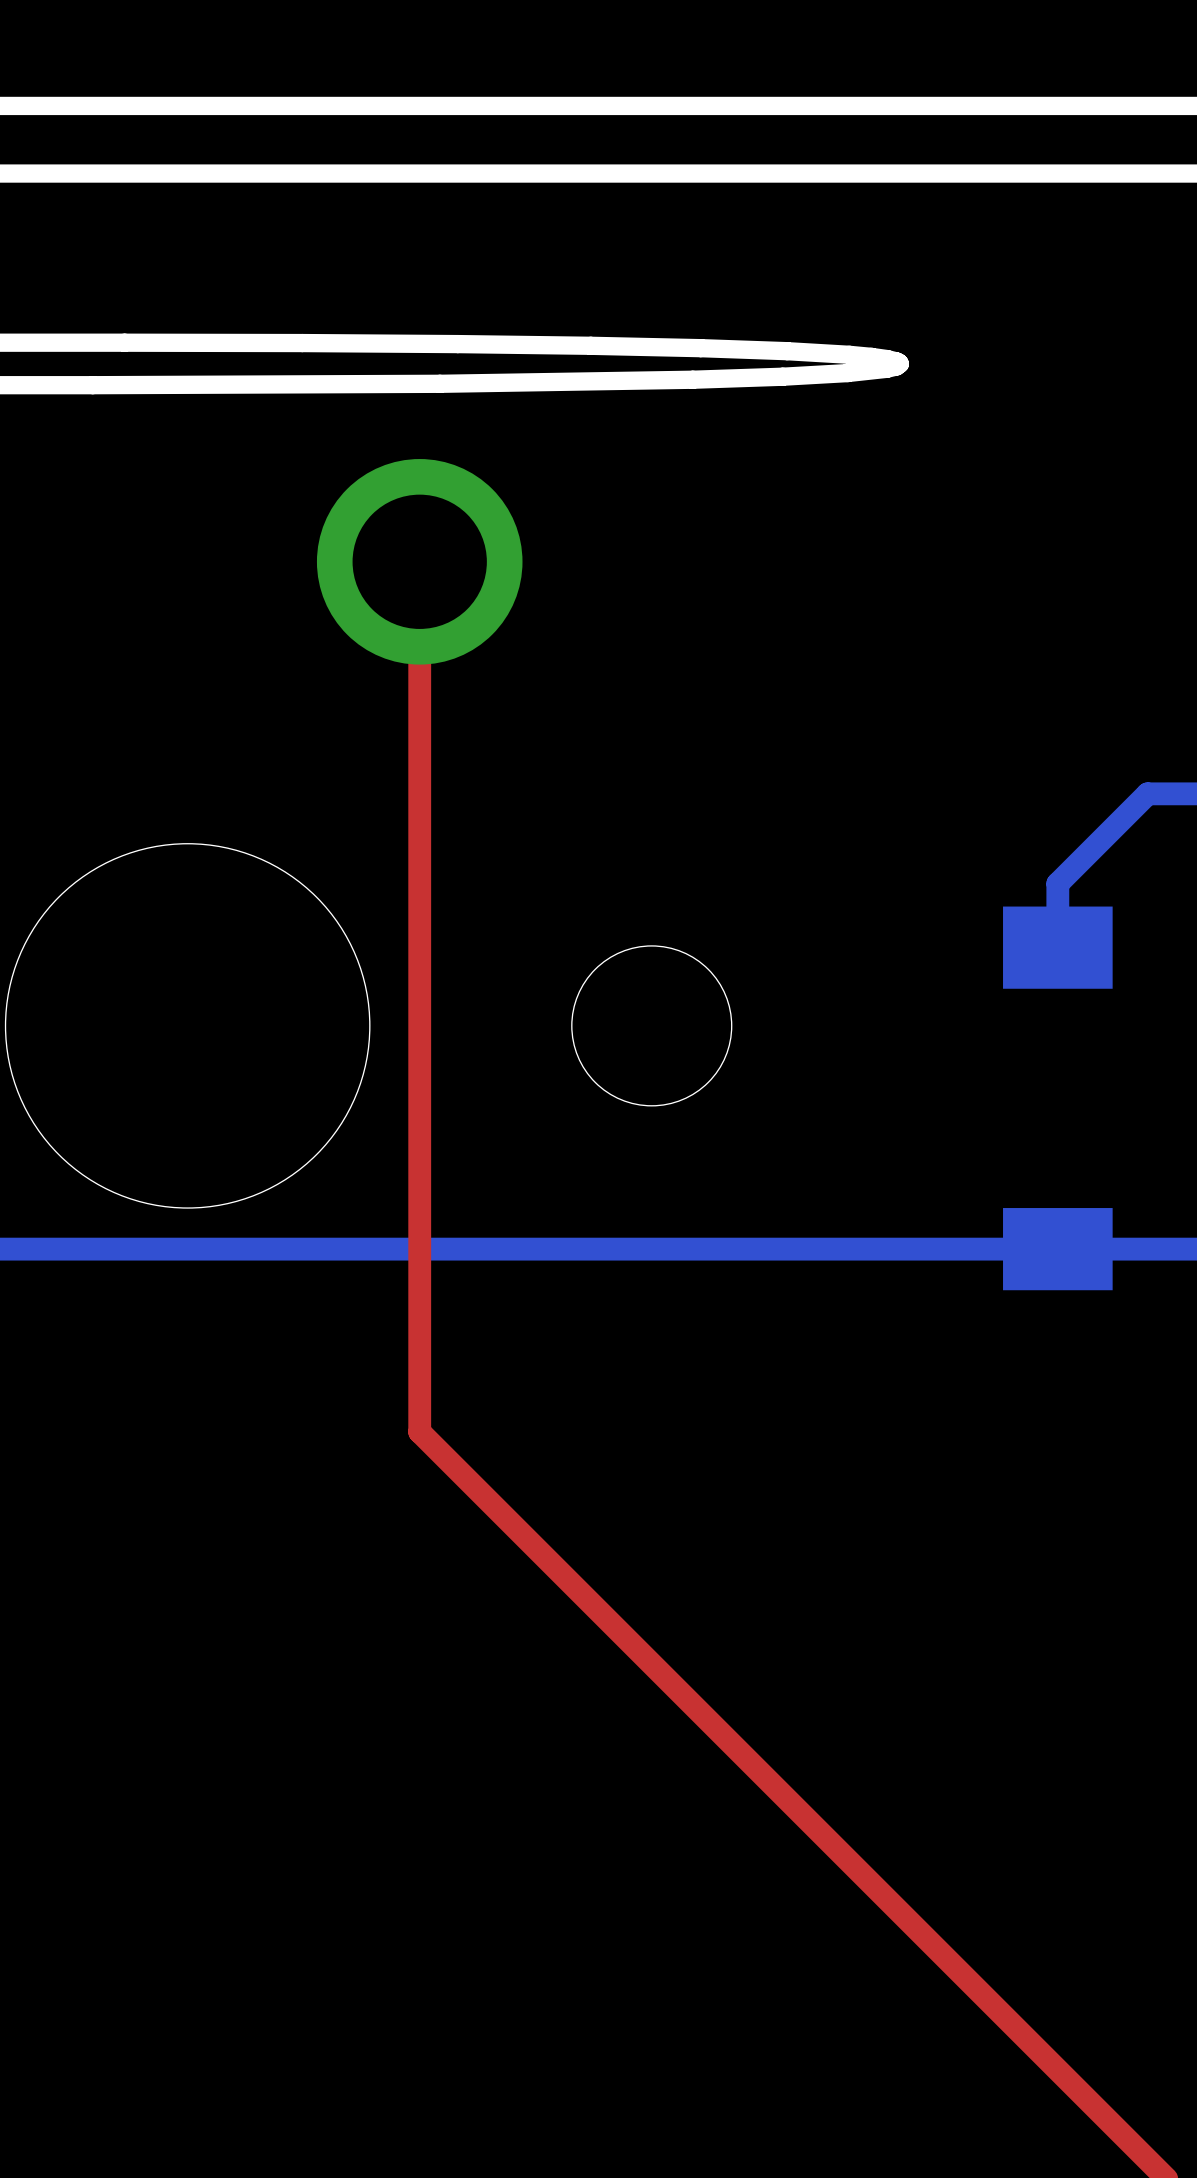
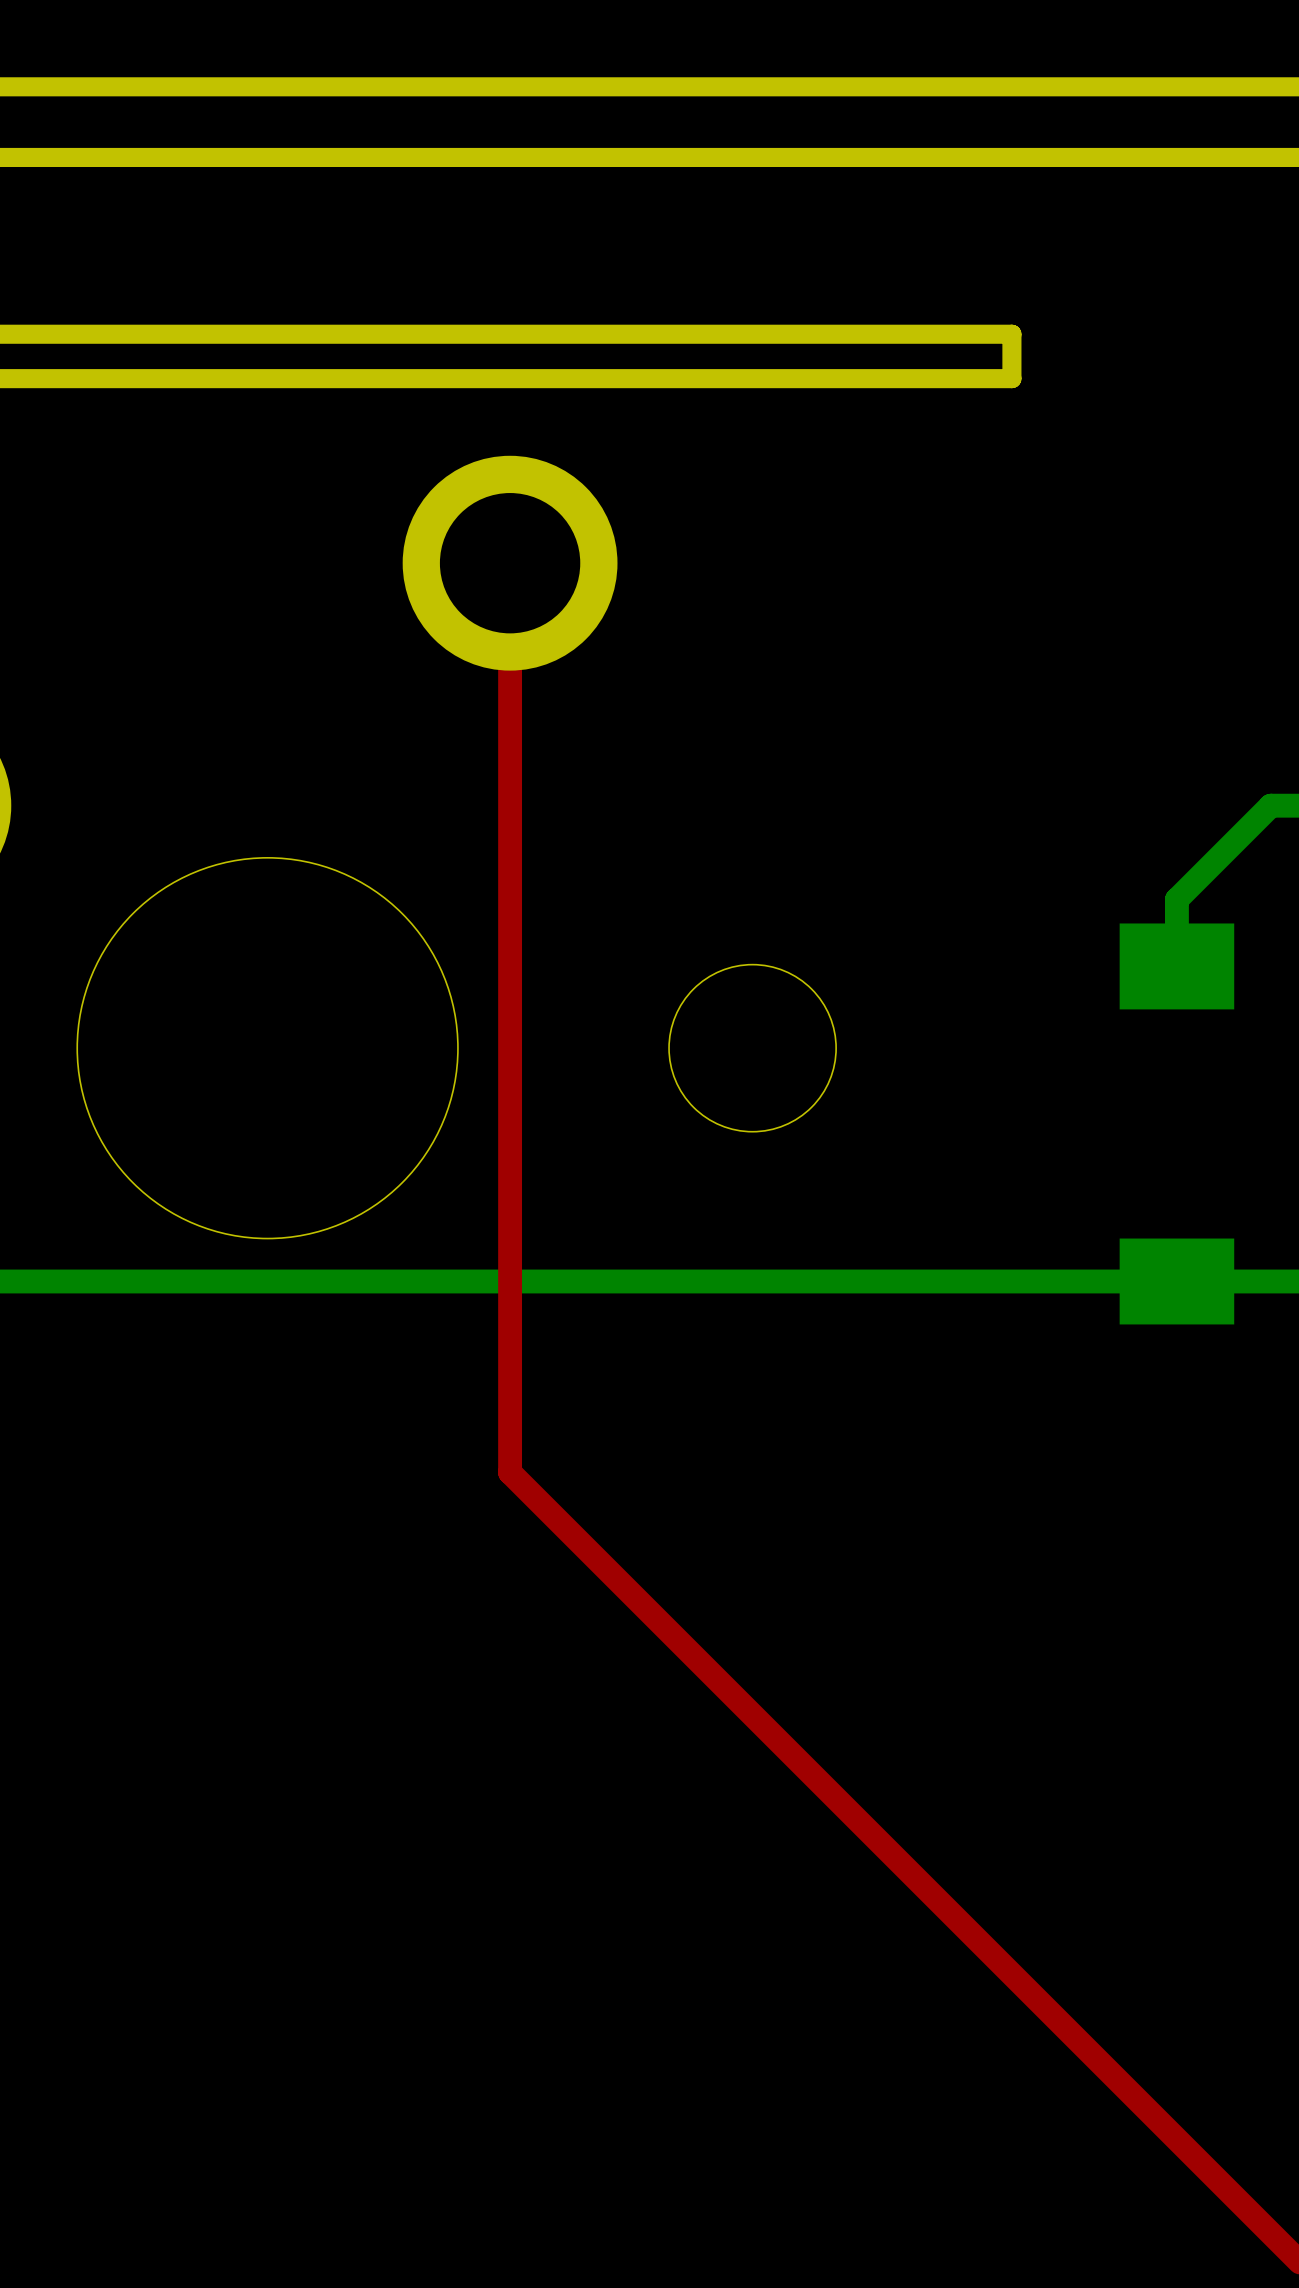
board edge: (124, 342) (457, 344) (700, 348) (849, 354) (887, 359) (899, 362) -> none
board edge: (899, 363) (886, 368) (847, 373) (692, 379) (439, 383) (92, 385) -> (201, 334) (1011, 334) (1011, 378) (168, 378)

